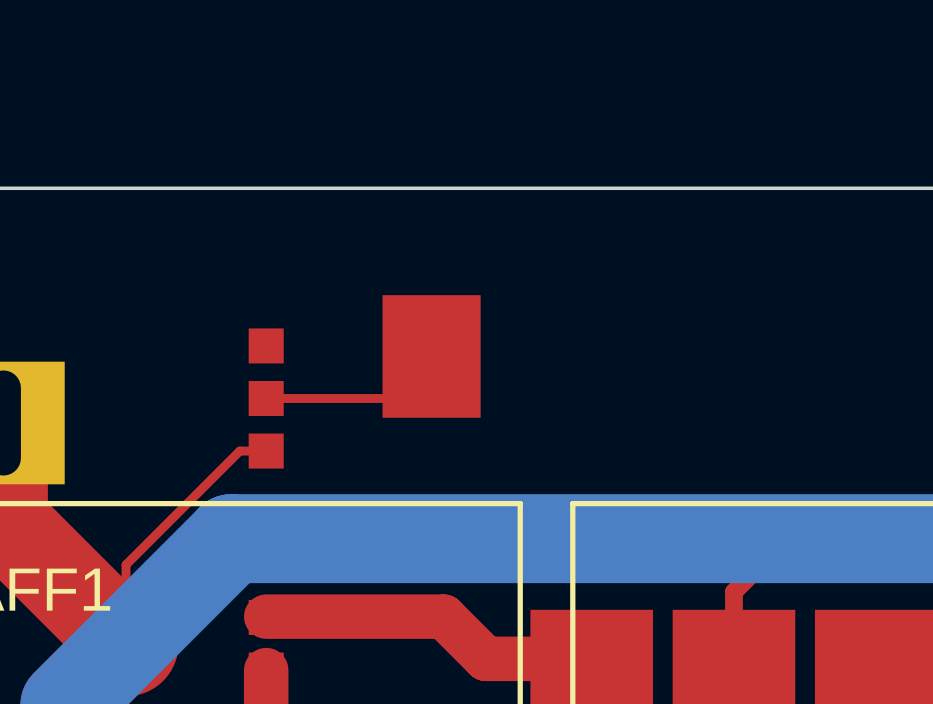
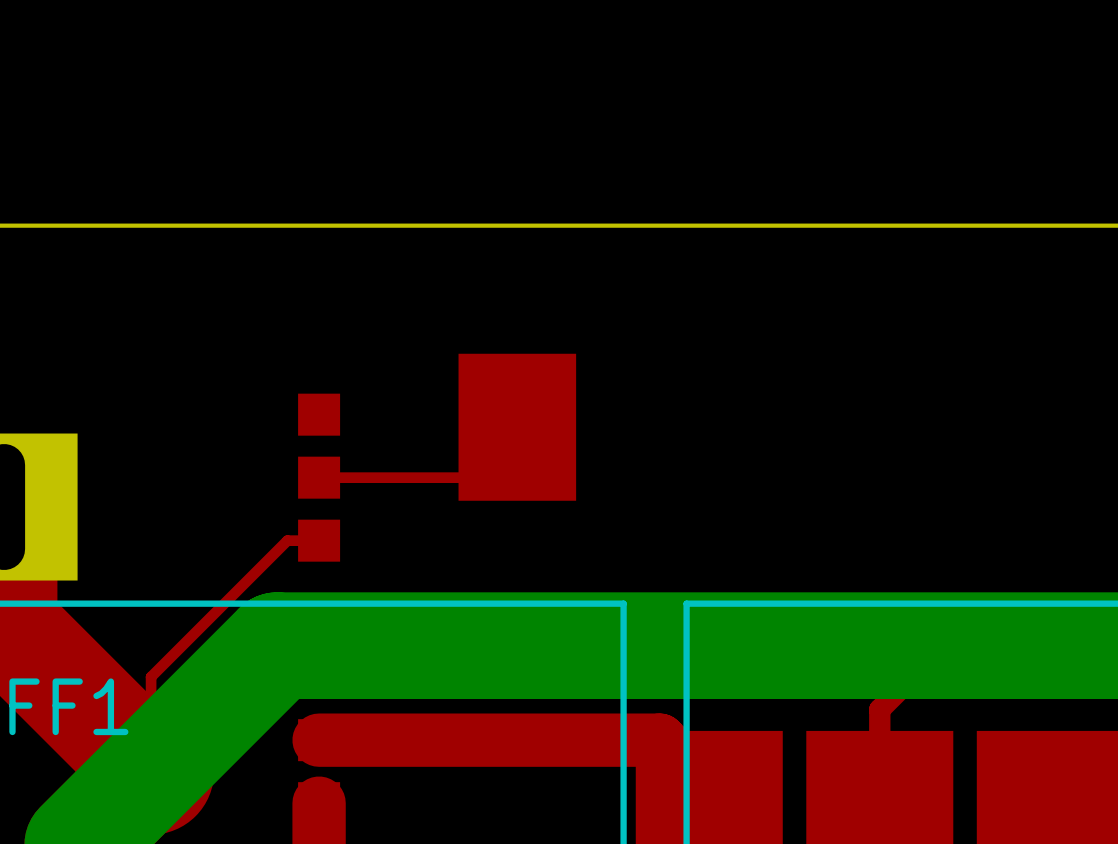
top track: (266, 616) (443, 616) (485, 658) (591, 658) -> (319, 740) (659, 740) (709, 789)

